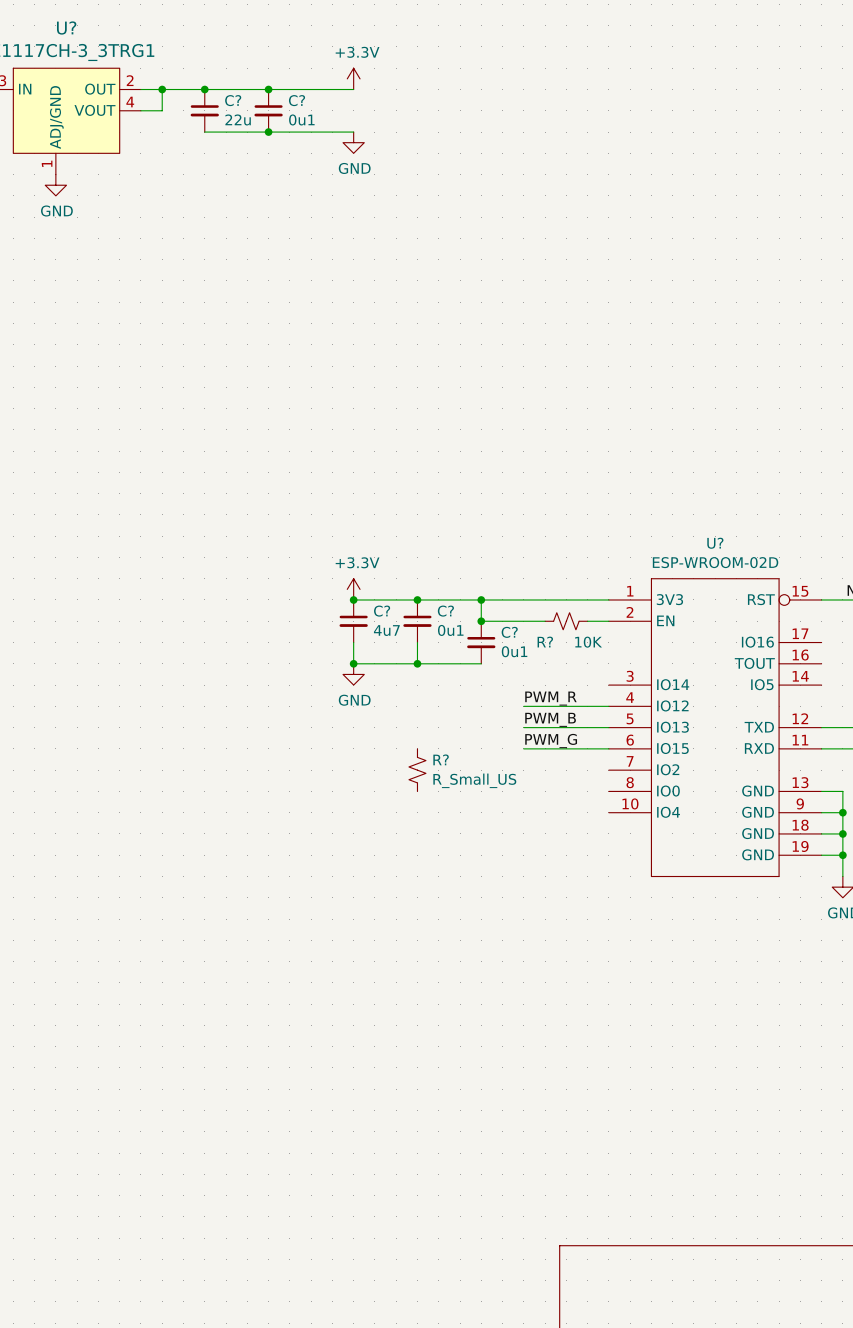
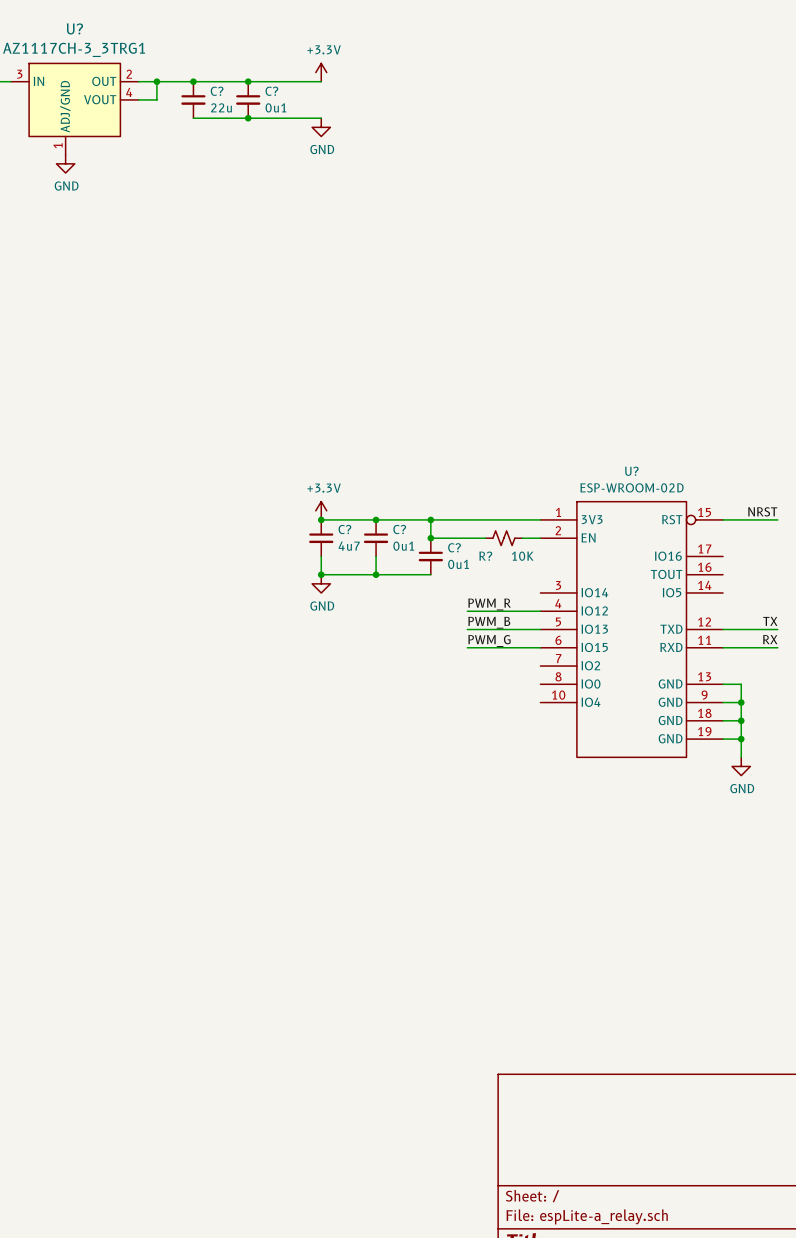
R?: R_Small_US (417, 770) -> none

